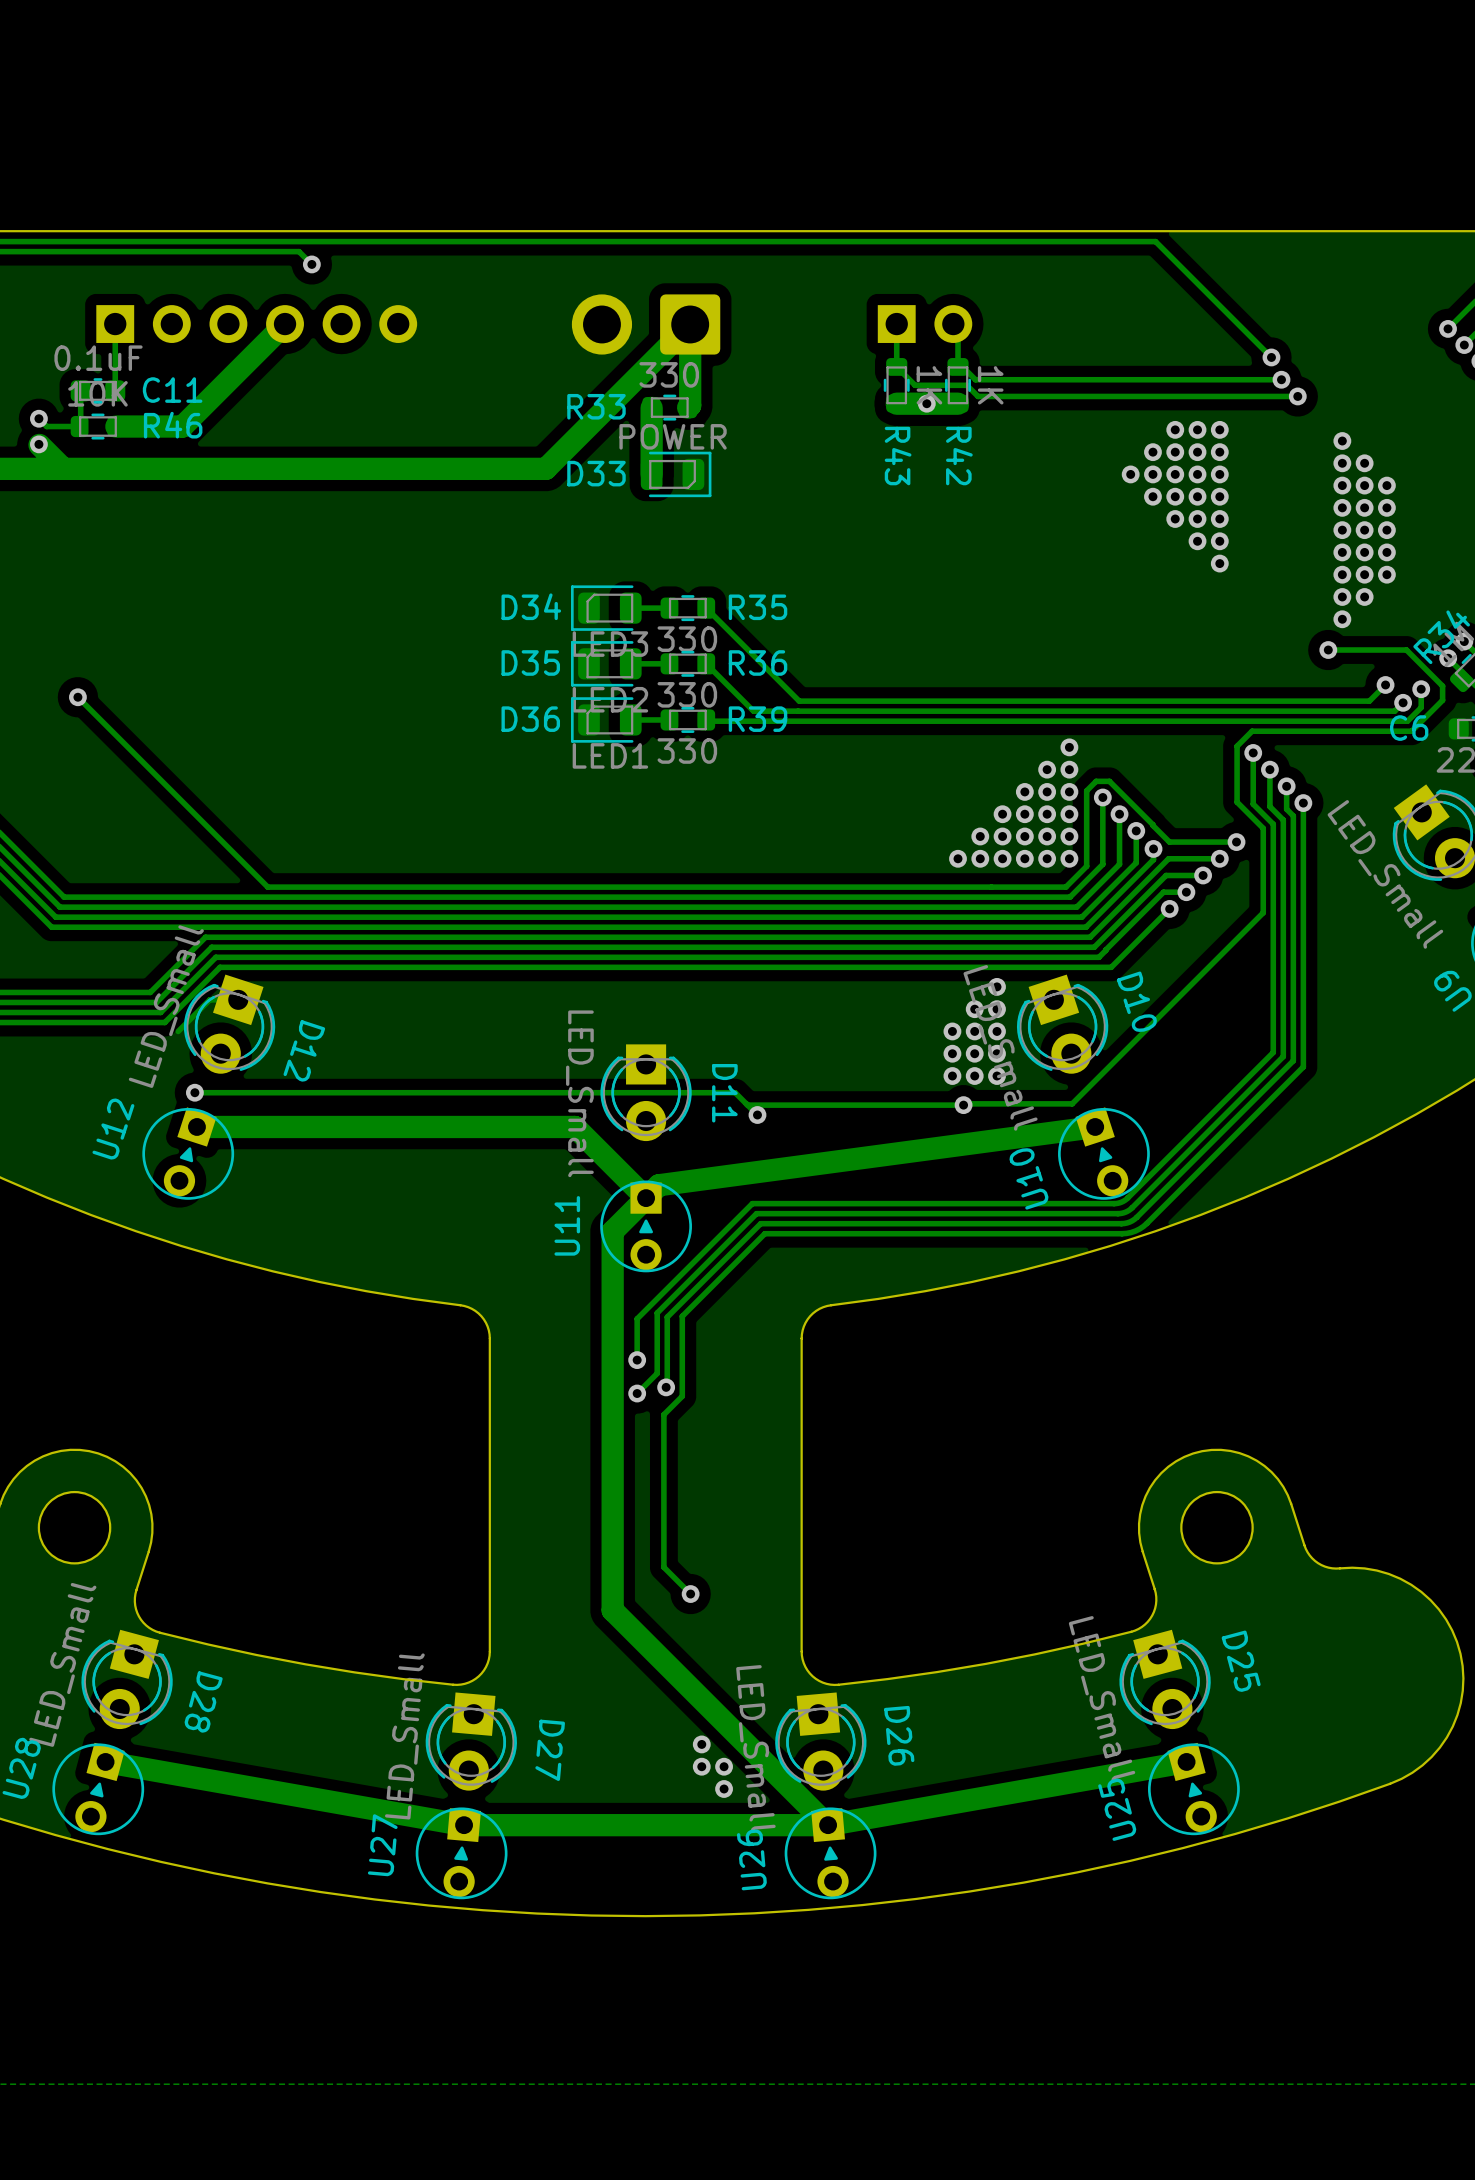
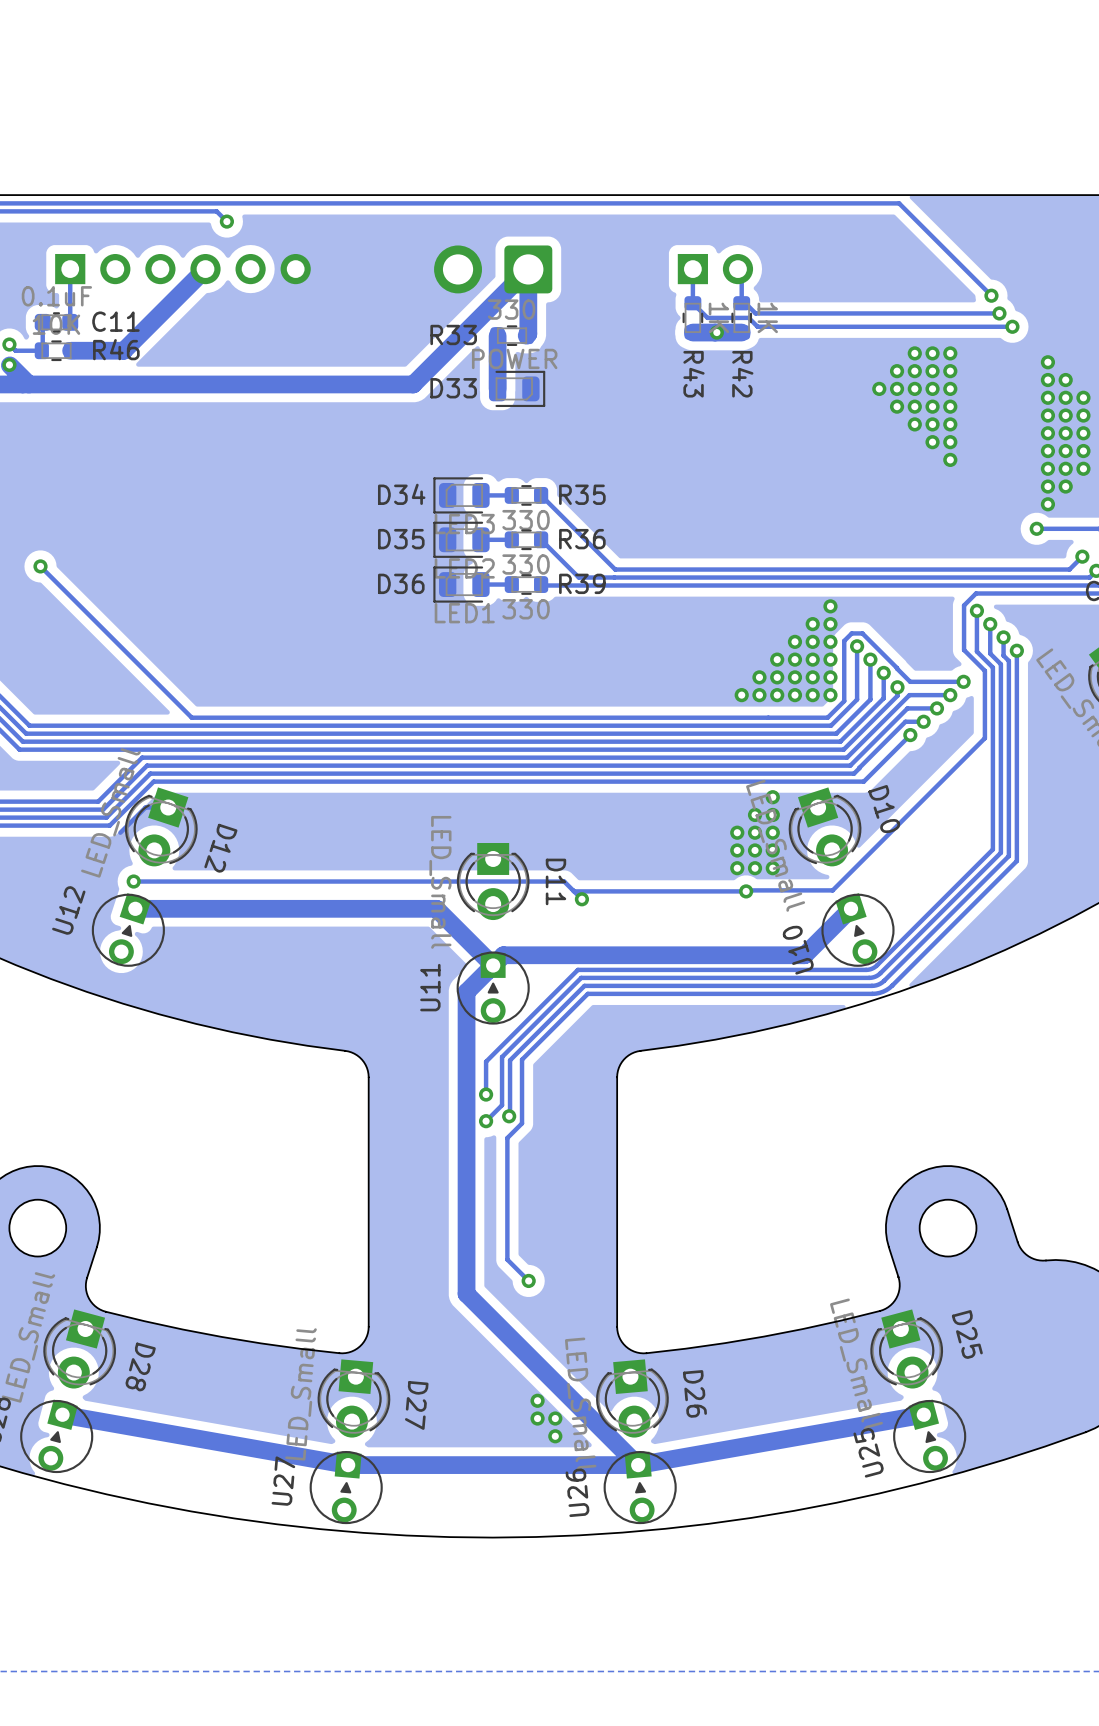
track: (1095, 1126) (658, 1185) -> (851, 908) (804, 955) (503, 955)

